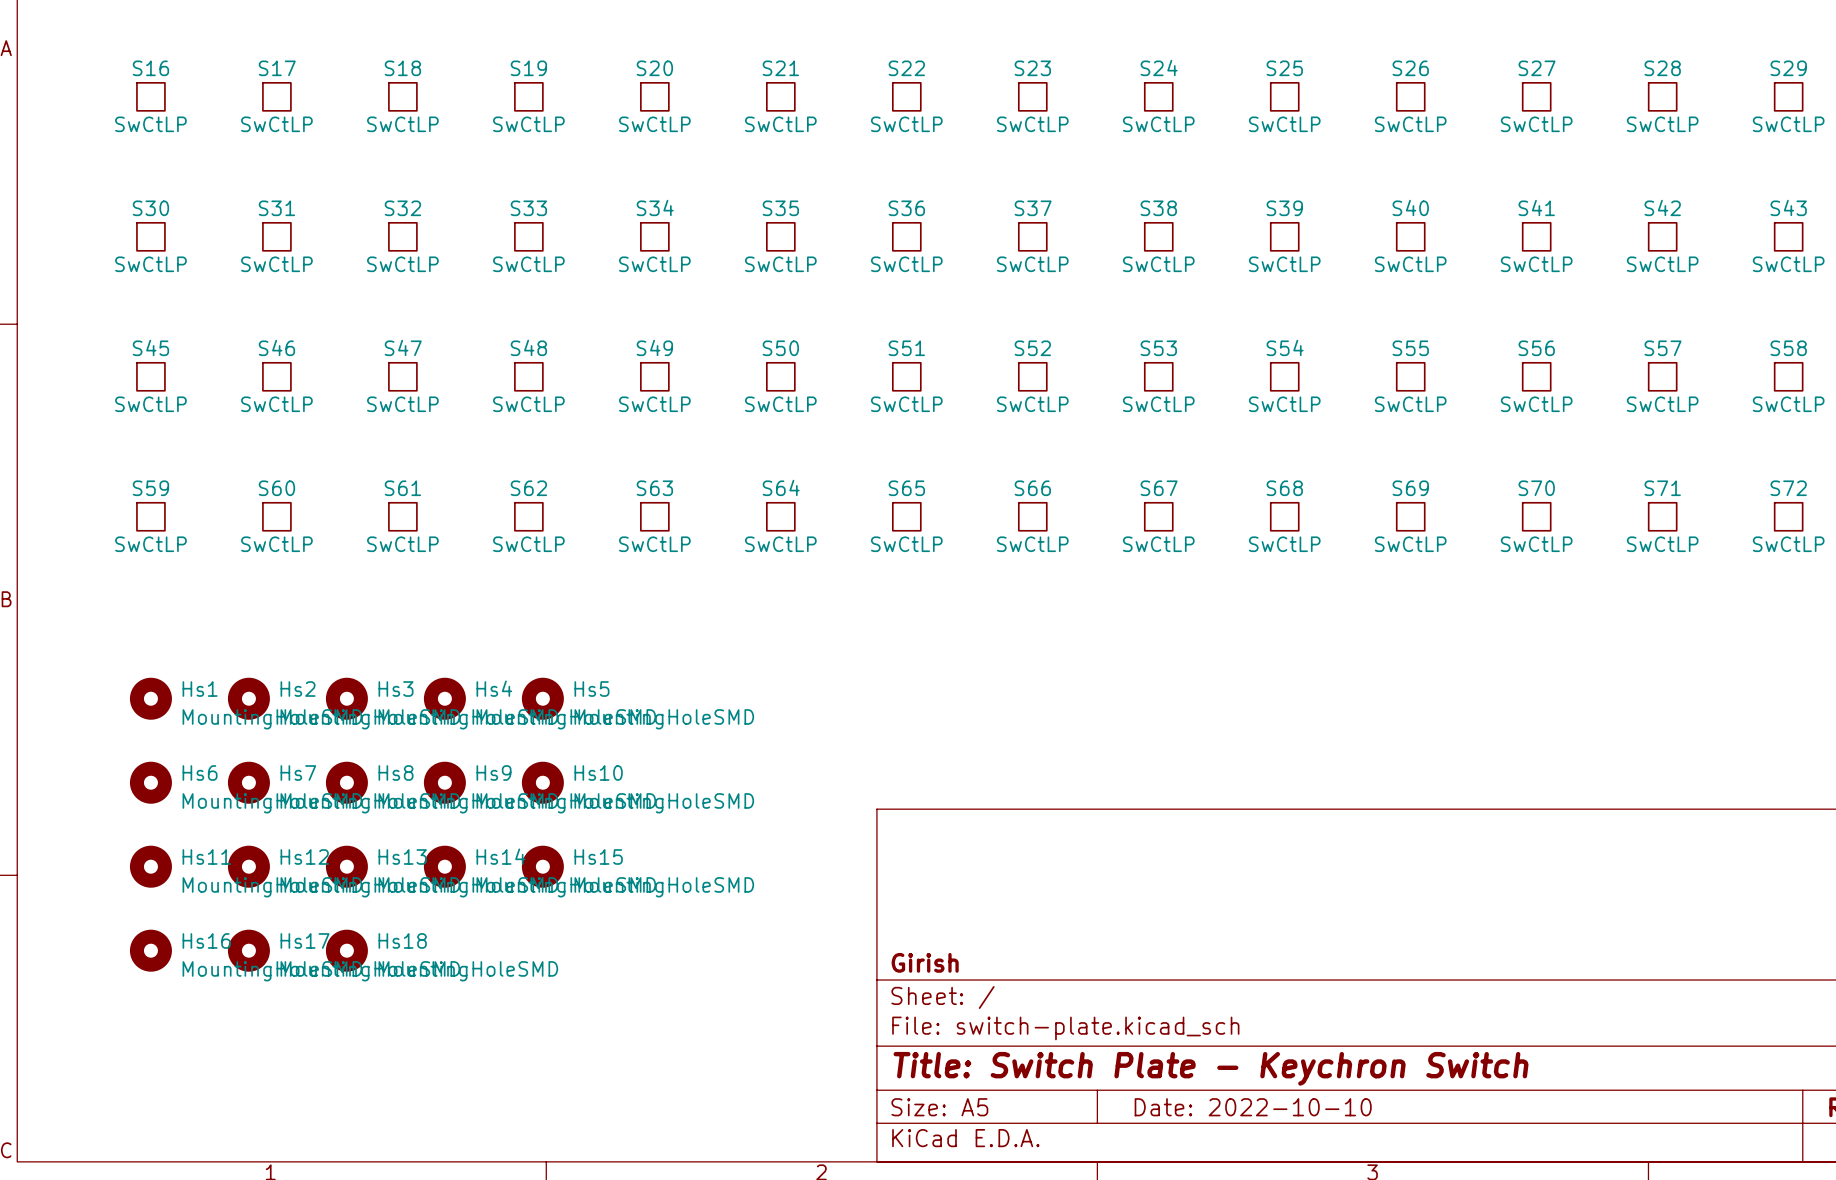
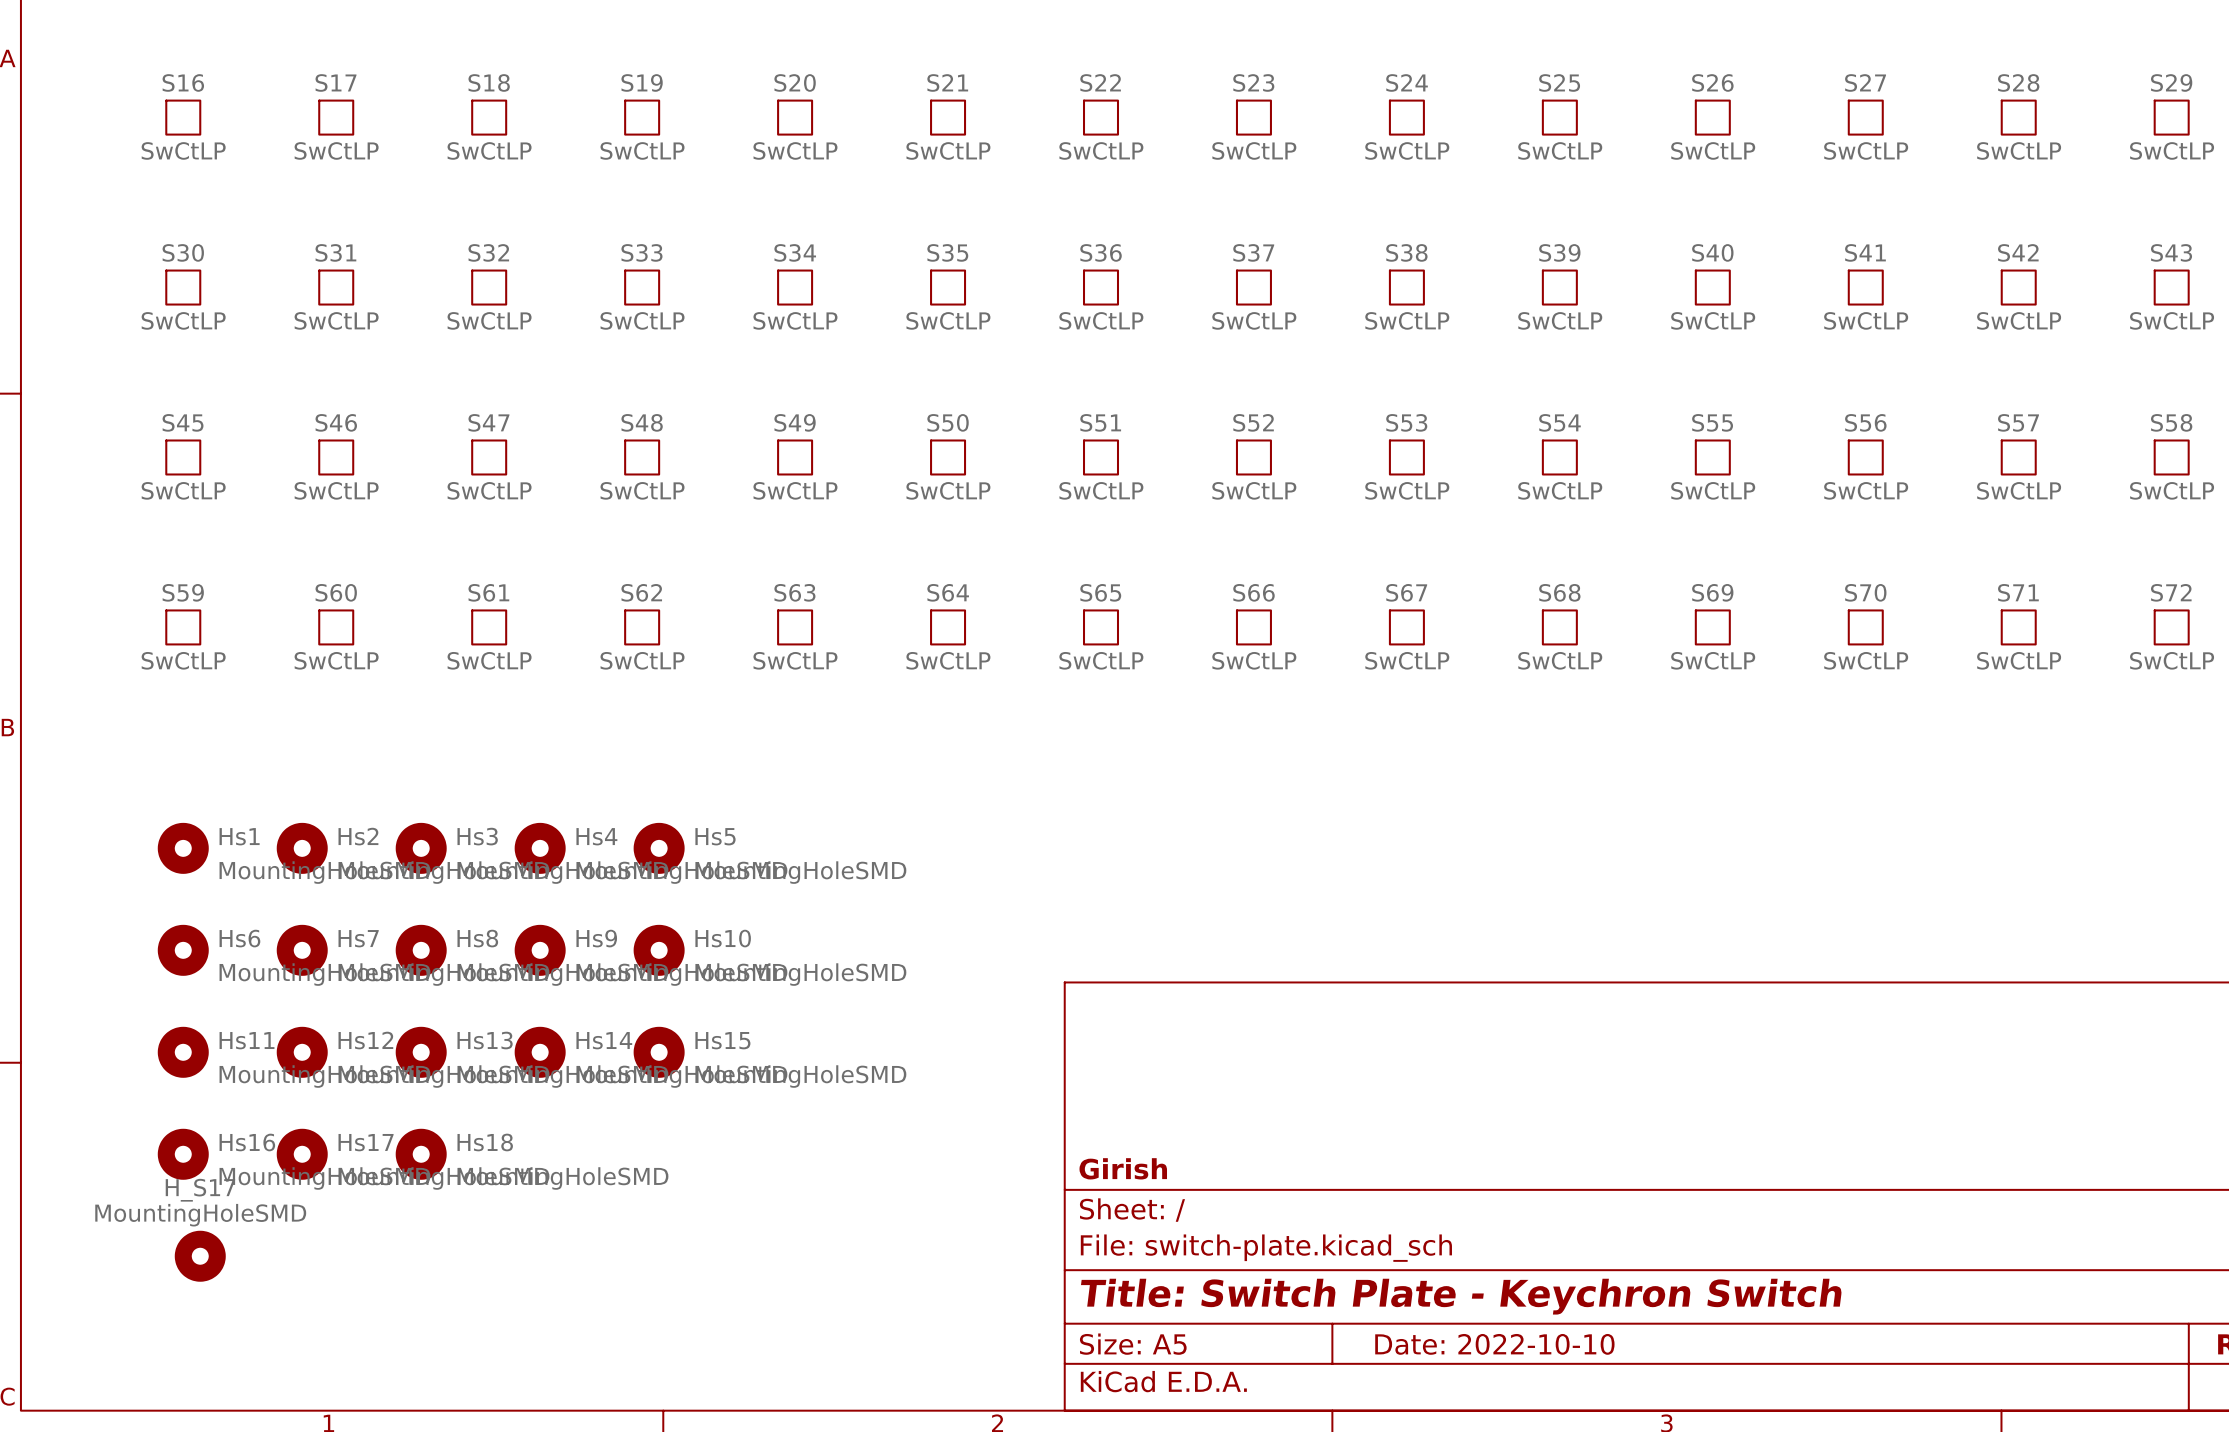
H_S17: none -> MountingHoleSMD (200, 1256)

